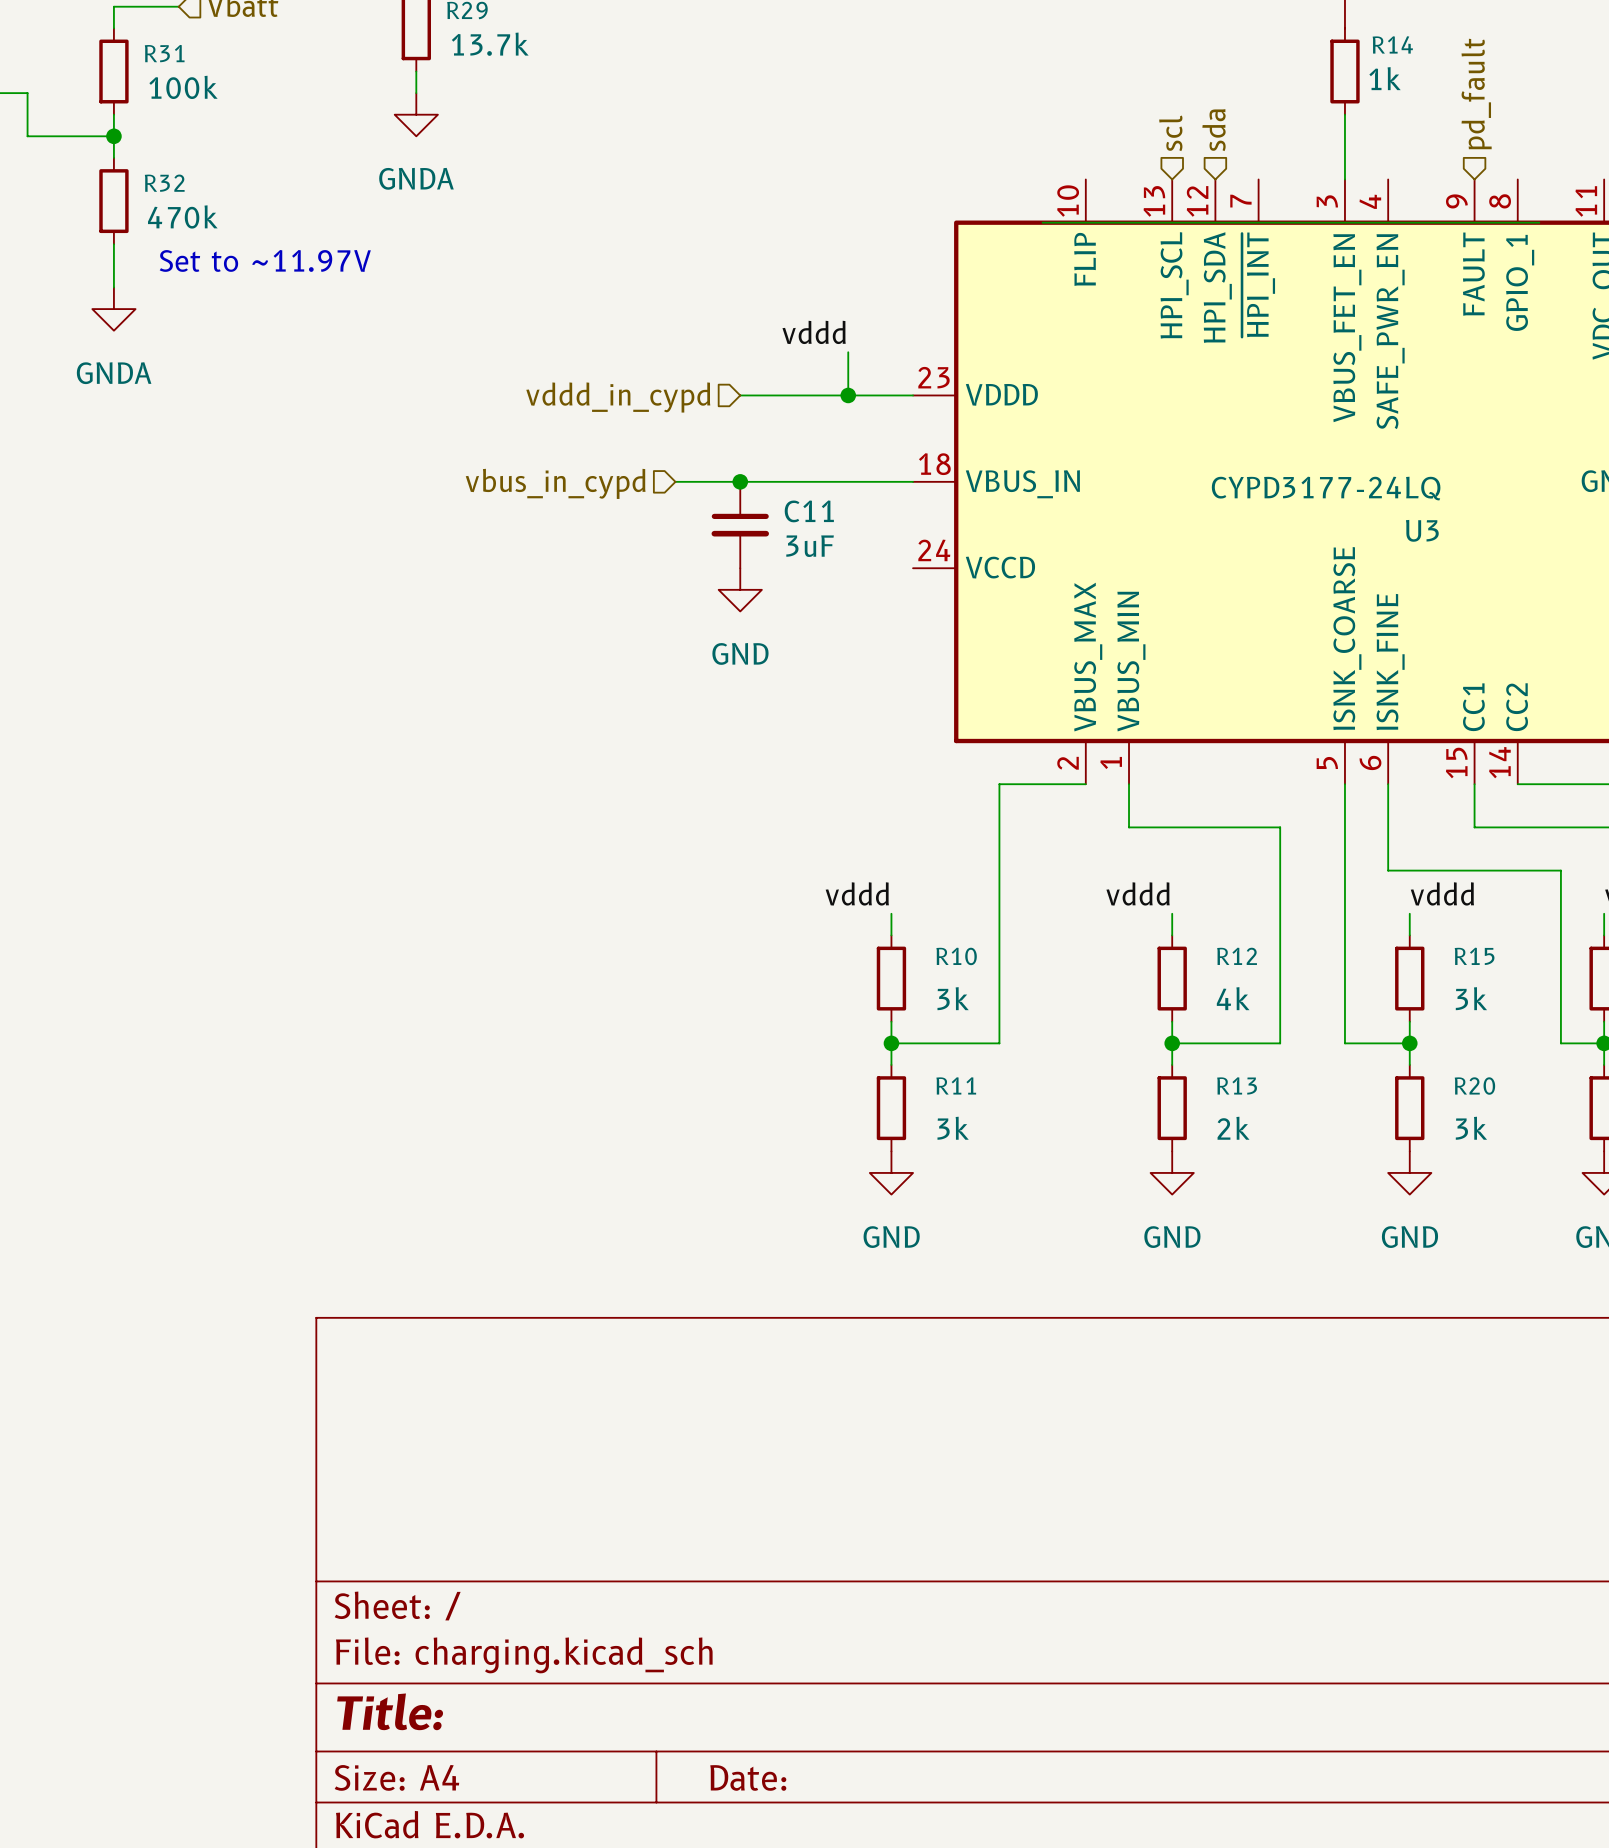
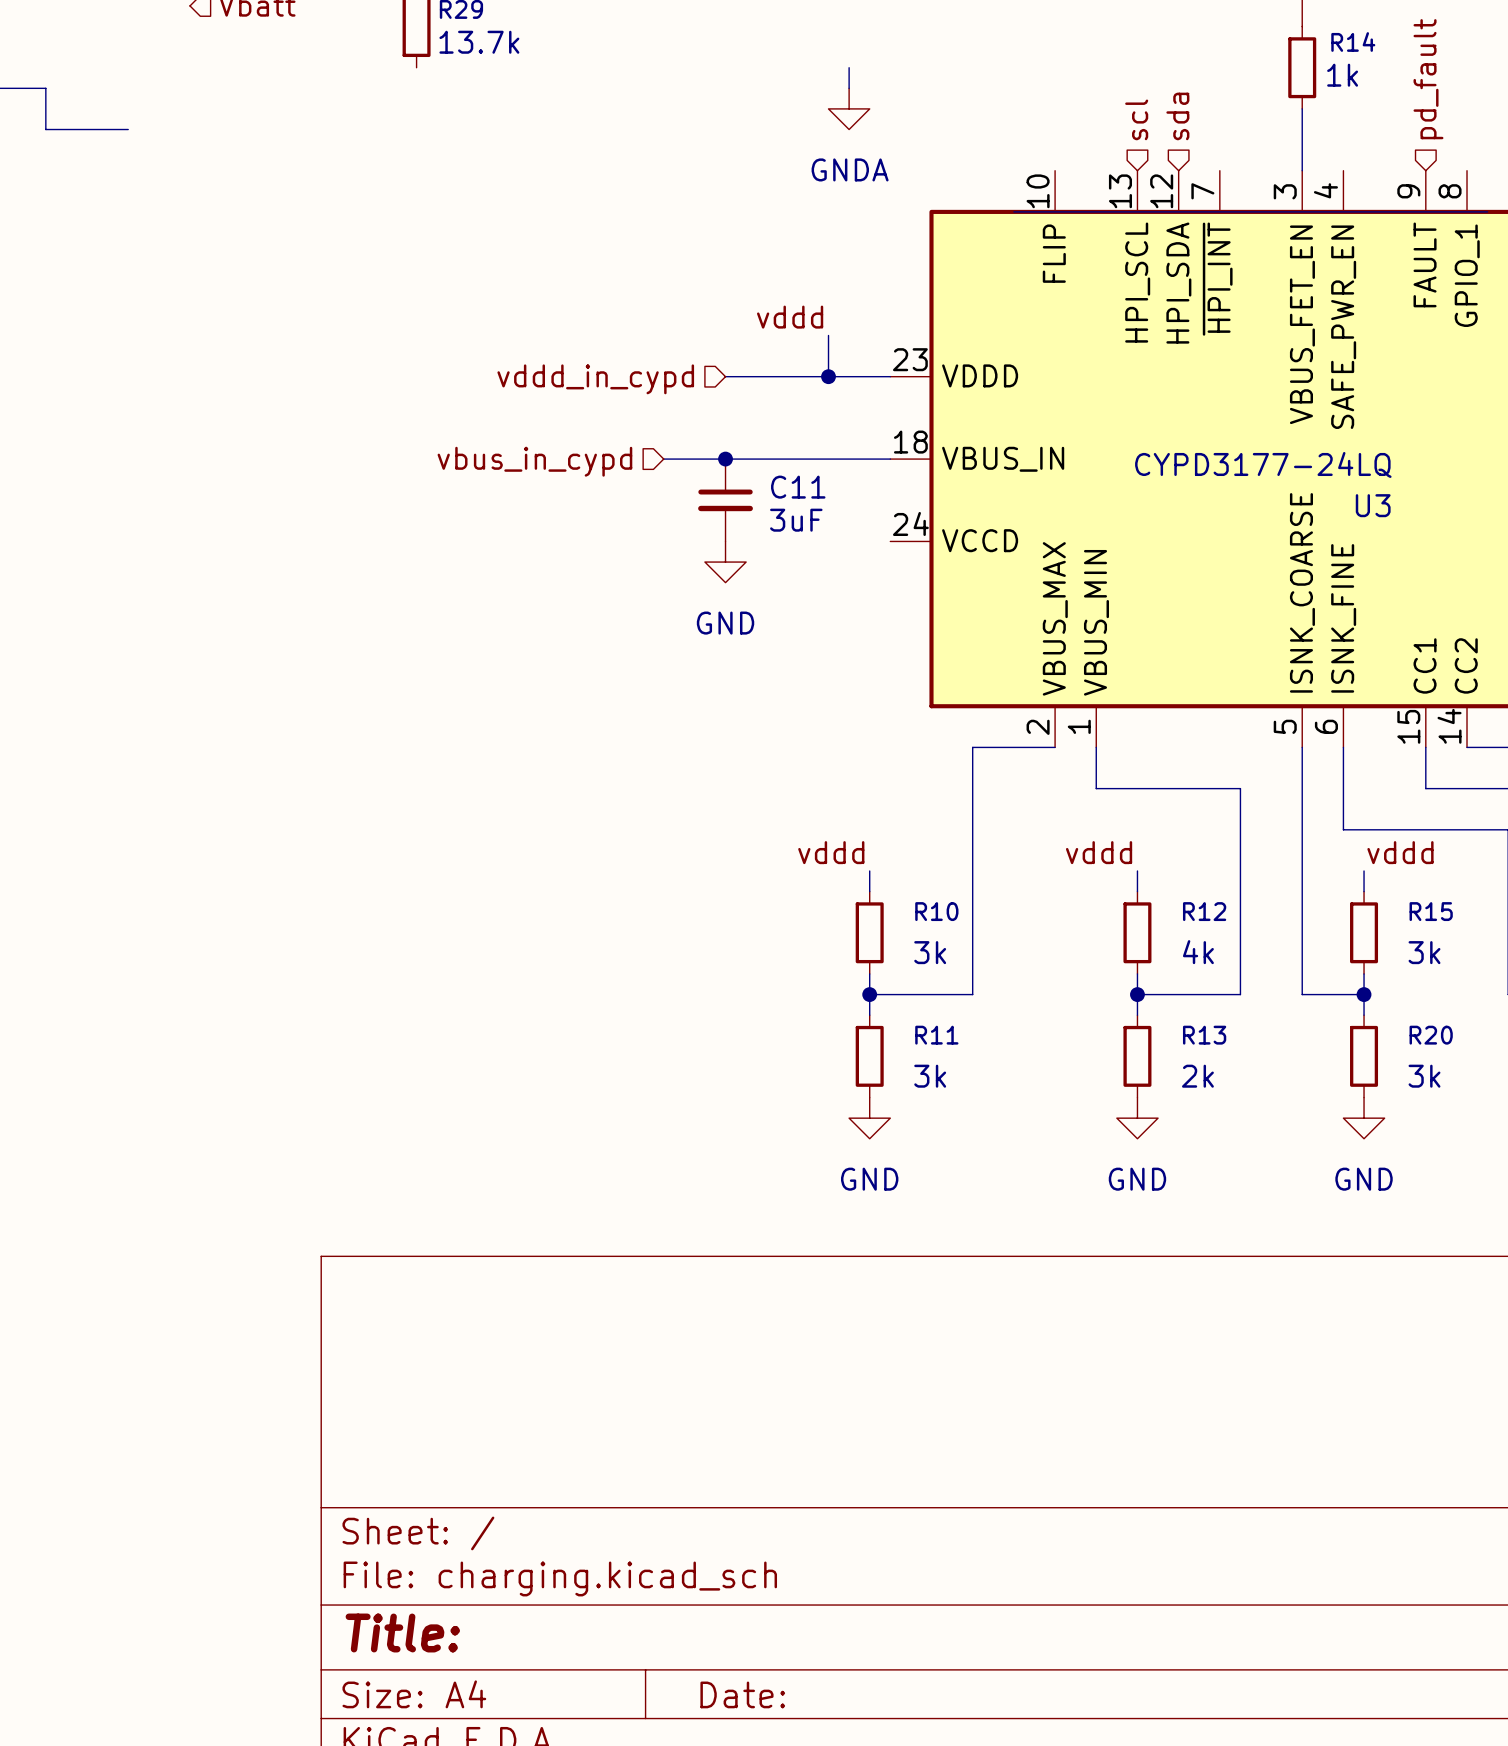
wire: (178, 6) (113, 6) (113, 28) -> none
R31: 100k (113, 71) -> none
wire: (416, 71) (416, 93) -> none
wire: none -> (849, 67) (849, 88)
wire: (113, 114) (113, 157) -> none
power symbol: GNDA (416, 114) -> none
power symbol: none -> GNDA (849, 108)
junction: (113, 136) -> none
R32: 470k (113, 201) -> none
wire: (113, 244) (113, 287) -> none
text: Set to ~11.97V (265, 260) -> none
power symbol: GNDA (113, 309) -> none

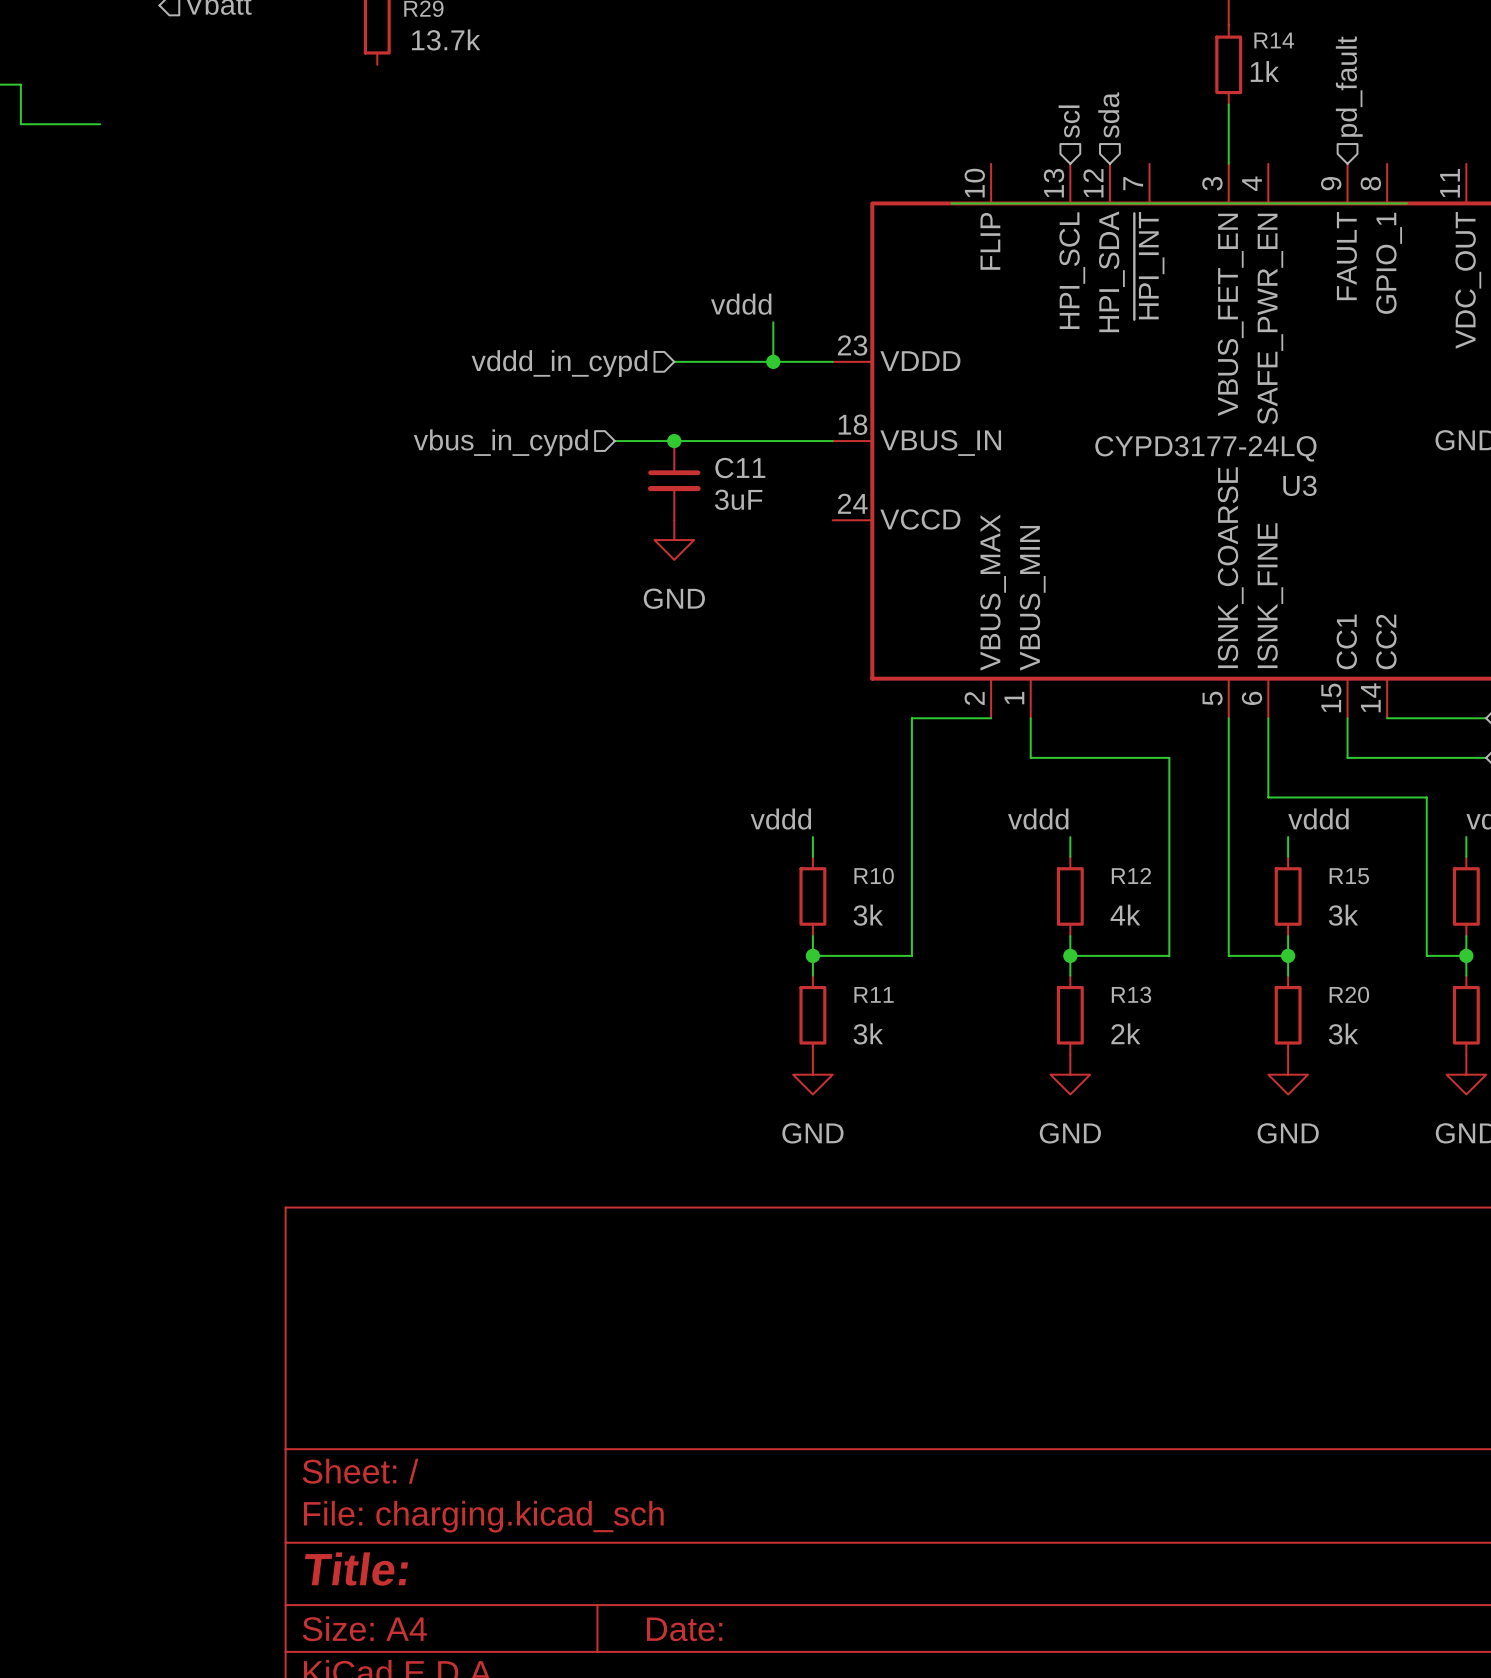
wire: (849, 67) (849, 88) -> none
power symbol: GNDA (849, 108) -> none

